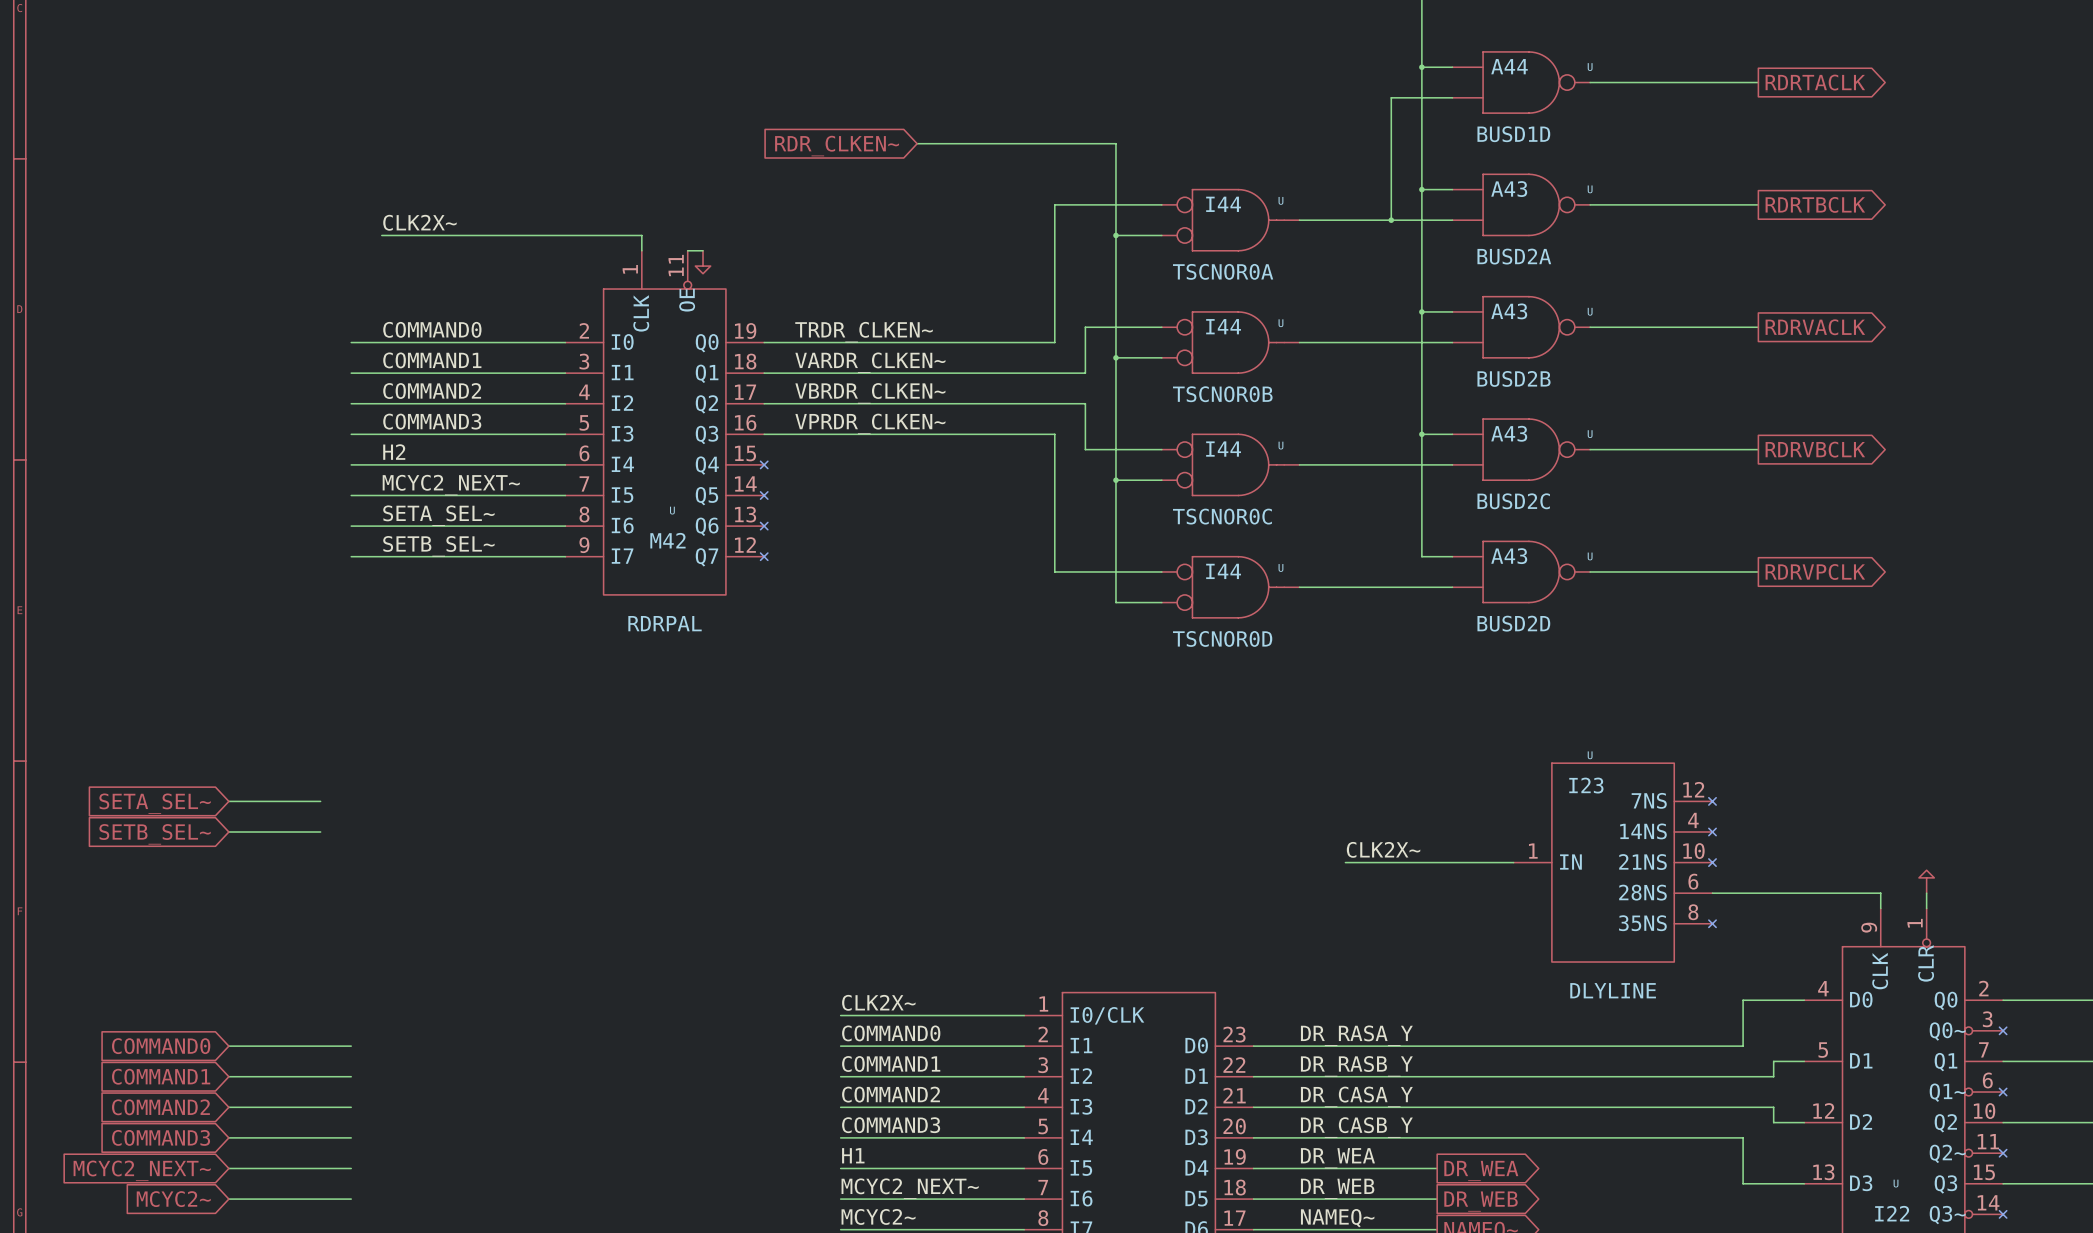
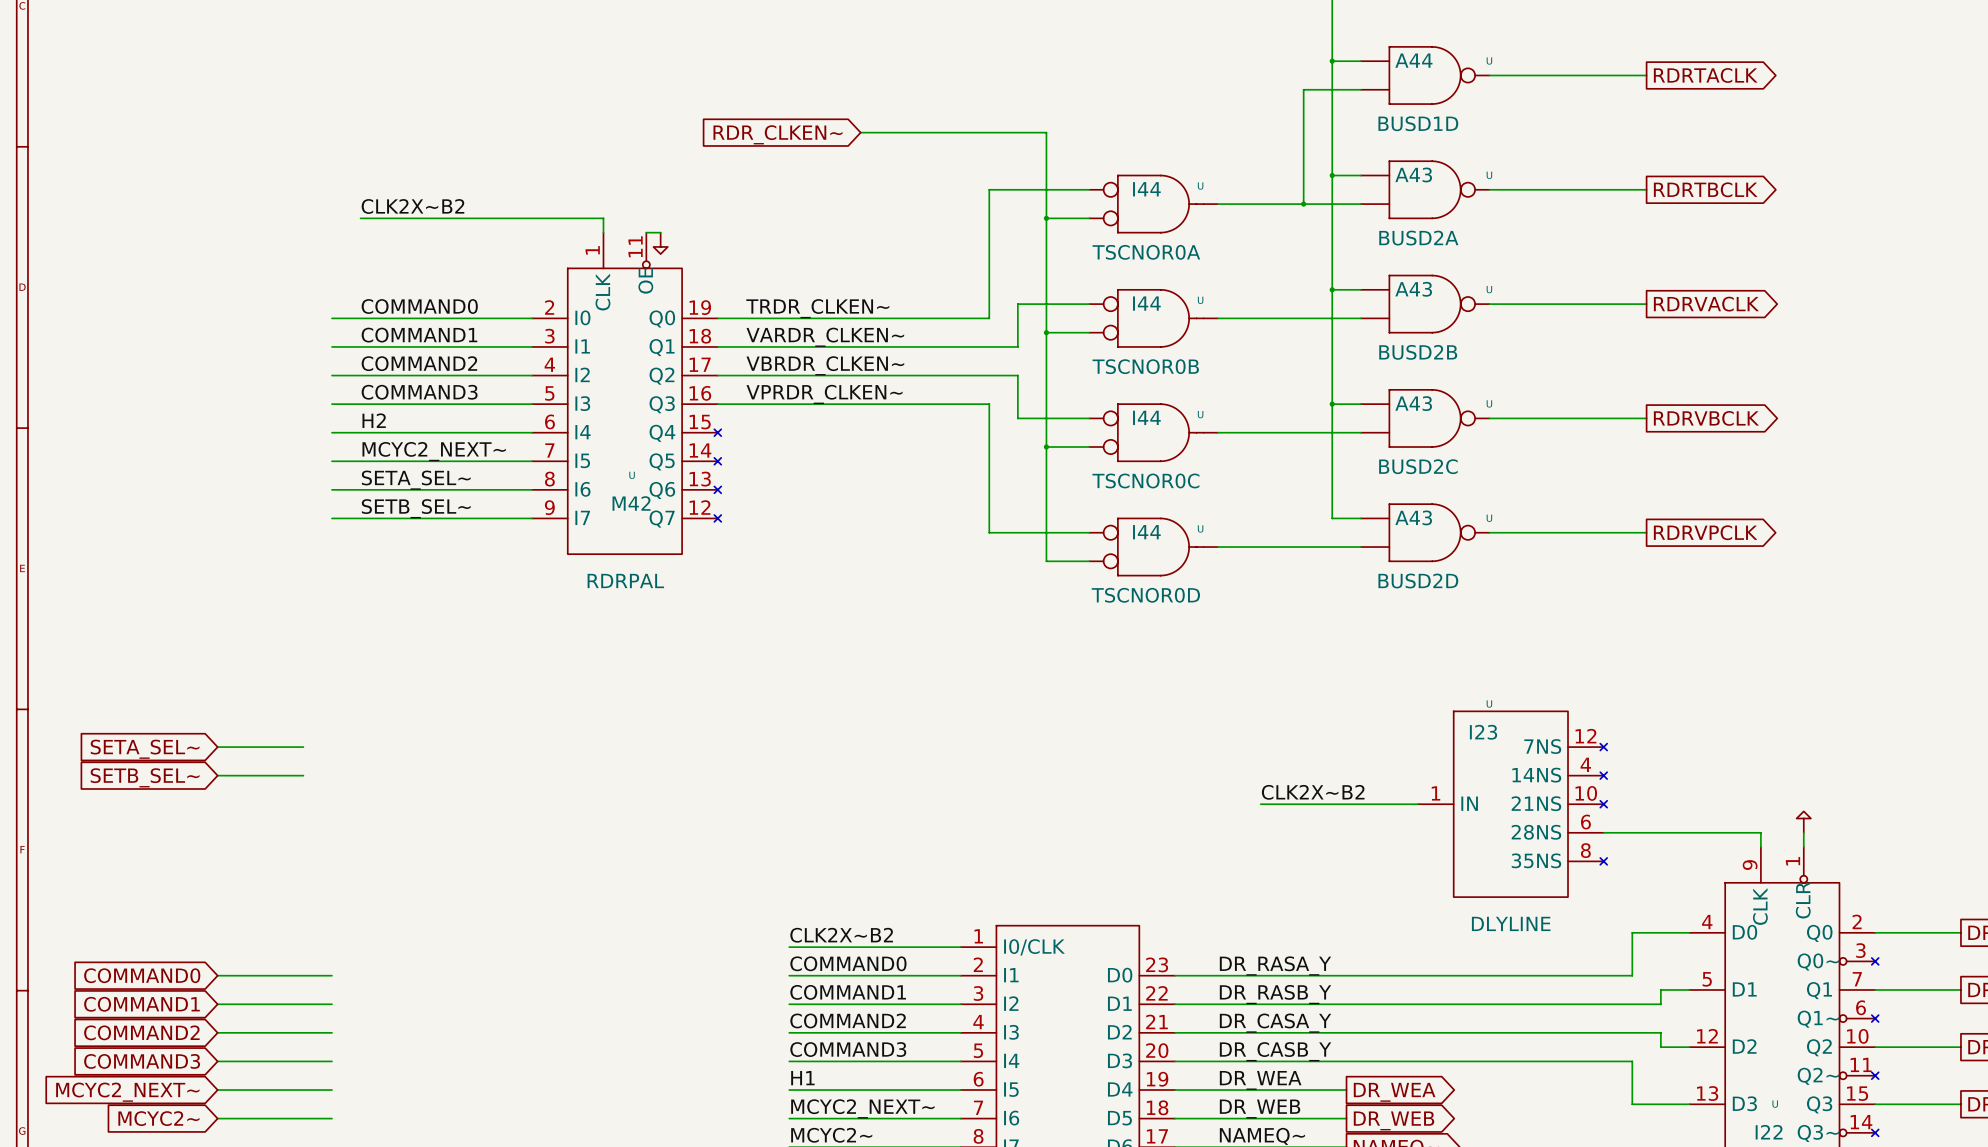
label: CLK2X~ (419, 222) -> CLK2X~B2 (412, 206)
label: CLK2X~ (1383, 849) -> CLK2X~B2 (1313, 792)
label: CLK2X~ (878, 1002) -> CLK2X~B2 (841, 935)

